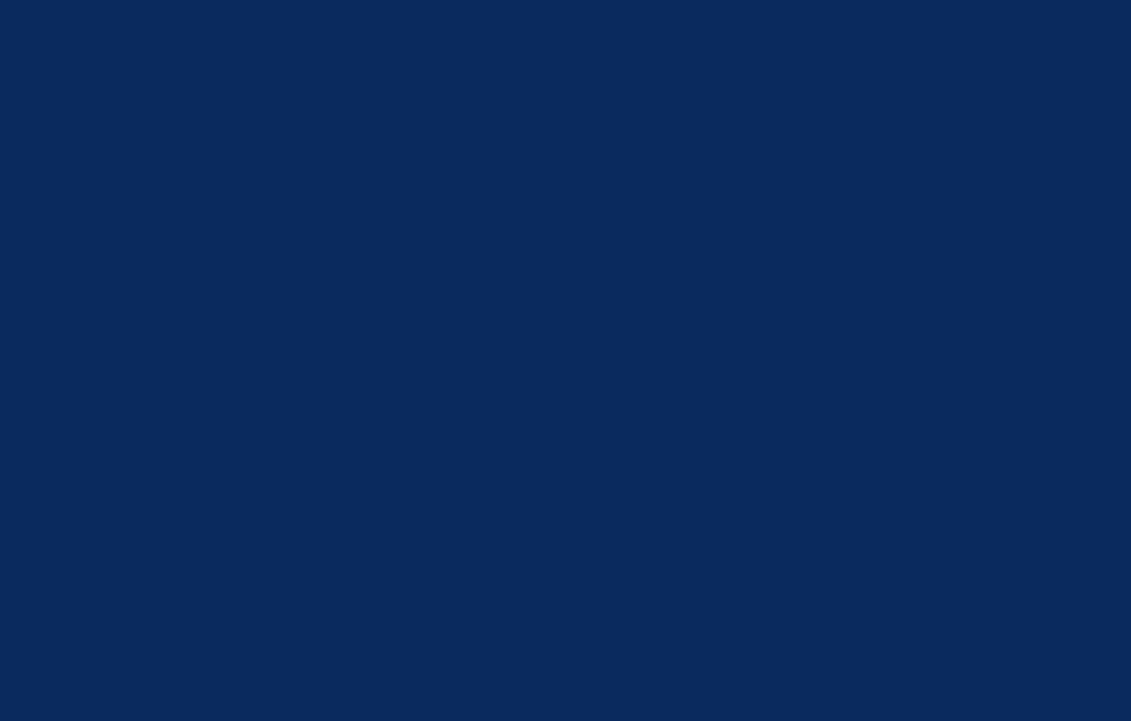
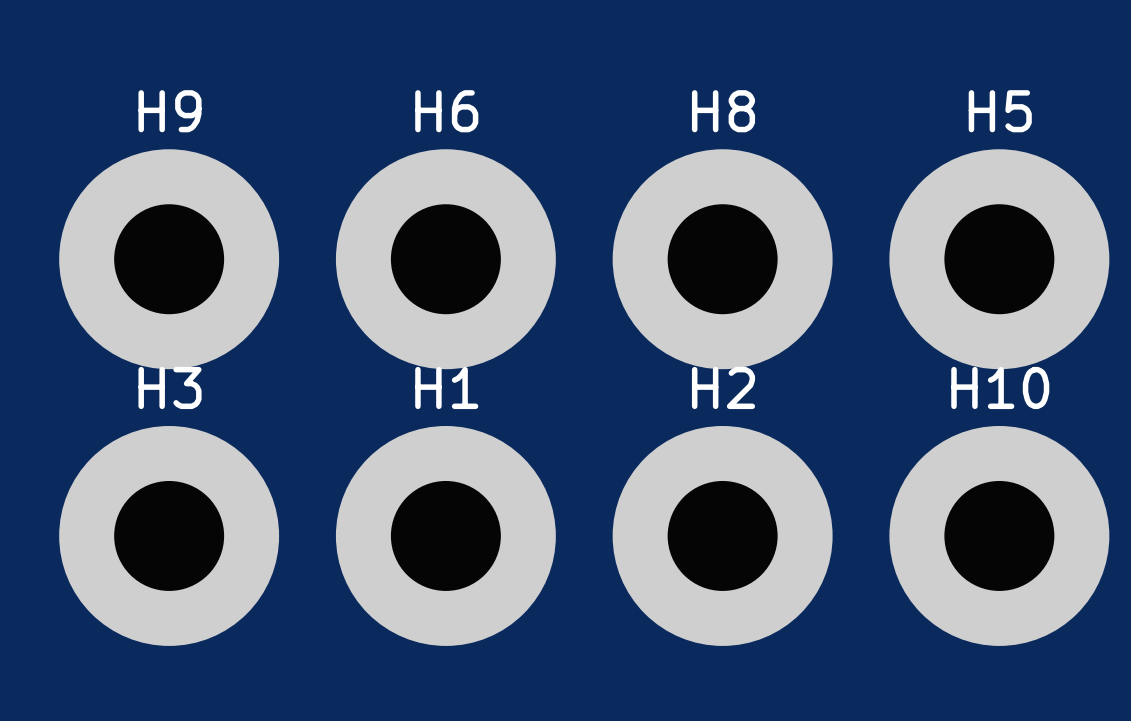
H9: none -> (169, 259)
H6: none -> (445, 259)
H8: none -> (722, 259)
H5: none -> (999, 259)
H3: none -> (169, 535)
H1: none -> (445, 535)
H2: none -> (722, 535)
H10: none -> (999, 535)

